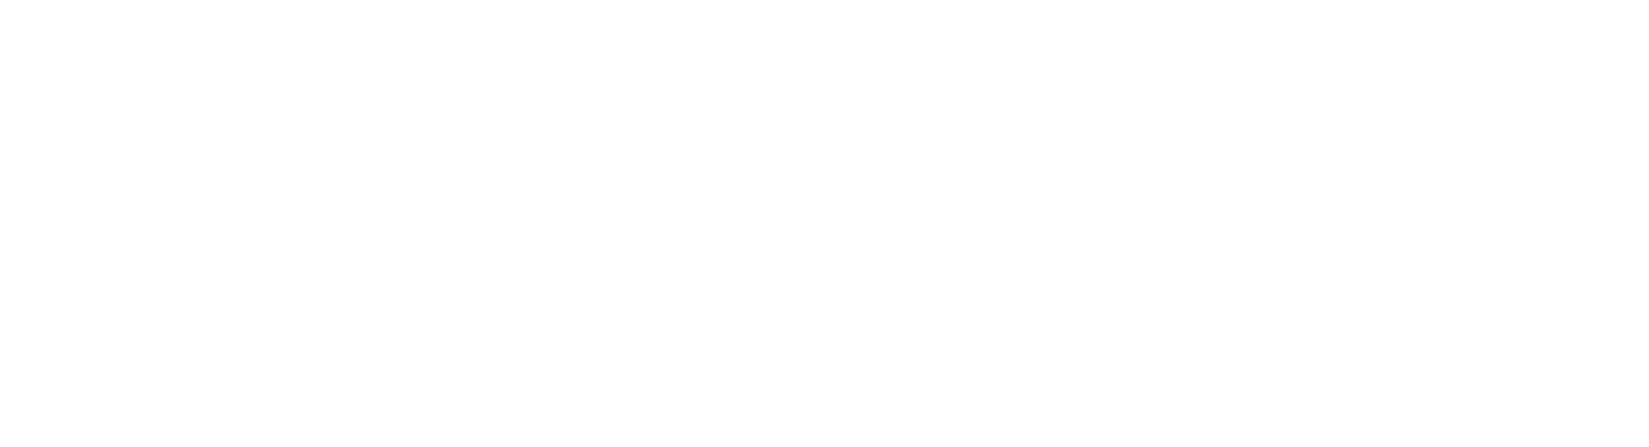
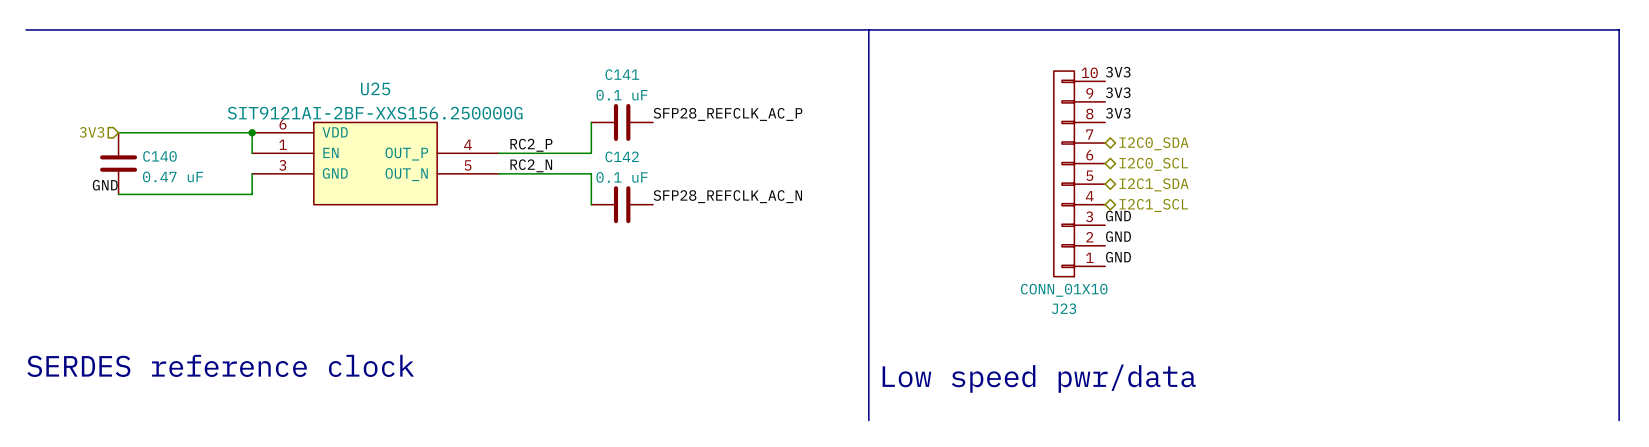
line: none -> (26, 29) (1619, 29) (1619, 420)
line: none -> (868, 29) (868, 420)
label: none -> 3V3 (1118, 72)
label: none -> 3V3 (1118, 92)
label: none -> 3V3 (1118, 113)
label: none -> SFP28_REFCLK_AC_P (728, 114)
wire: none -> (591, 122) (591, 153) (498, 153)
C141: none -> 0.1 uF (622, 122)
hierarchical label: none -> 3V3 (92, 132)
wire: none -> (118, 132) (252, 132) (252, 153)
junction: none -> (252, 132)
hierarchical label: none -> I2C0_SDA (1154, 143)
label: none -> RC2_P (531, 145)
C140: none -> 0.47 uF (118, 163)
U25: none -> SIT9121AI-2BF-XXS156.250000G (375, 163)
hierarchical label: none -> I2C0_SCL (1153, 164)
label: none -> RC2_N (531, 165)
wire: none -> (252, 173) (252, 194) (118, 194)
wire: none -> (498, 173) (591, 173) (591, 204)
J23: none -> CONN_01X10 (1079, 173)
hierarchical label: none -> I2C1_SDA (1154, 184)
label: none -> GND (105, 185)
label: none -> SFP28_REFCLK_AC_N (727, 196)
C142: none -> 0.1 uF (622, 204)
hierarchical label: none -> I2C1_SCL (1153, 205)
label: none -> GND (1118, 216)
label: none -> GND (1118, 236)
label: none -> GND (1118, 257)
text: none -> SERDES reference clock (220, 365)
text: none -> Low speed pwr/data (1039, 378)

